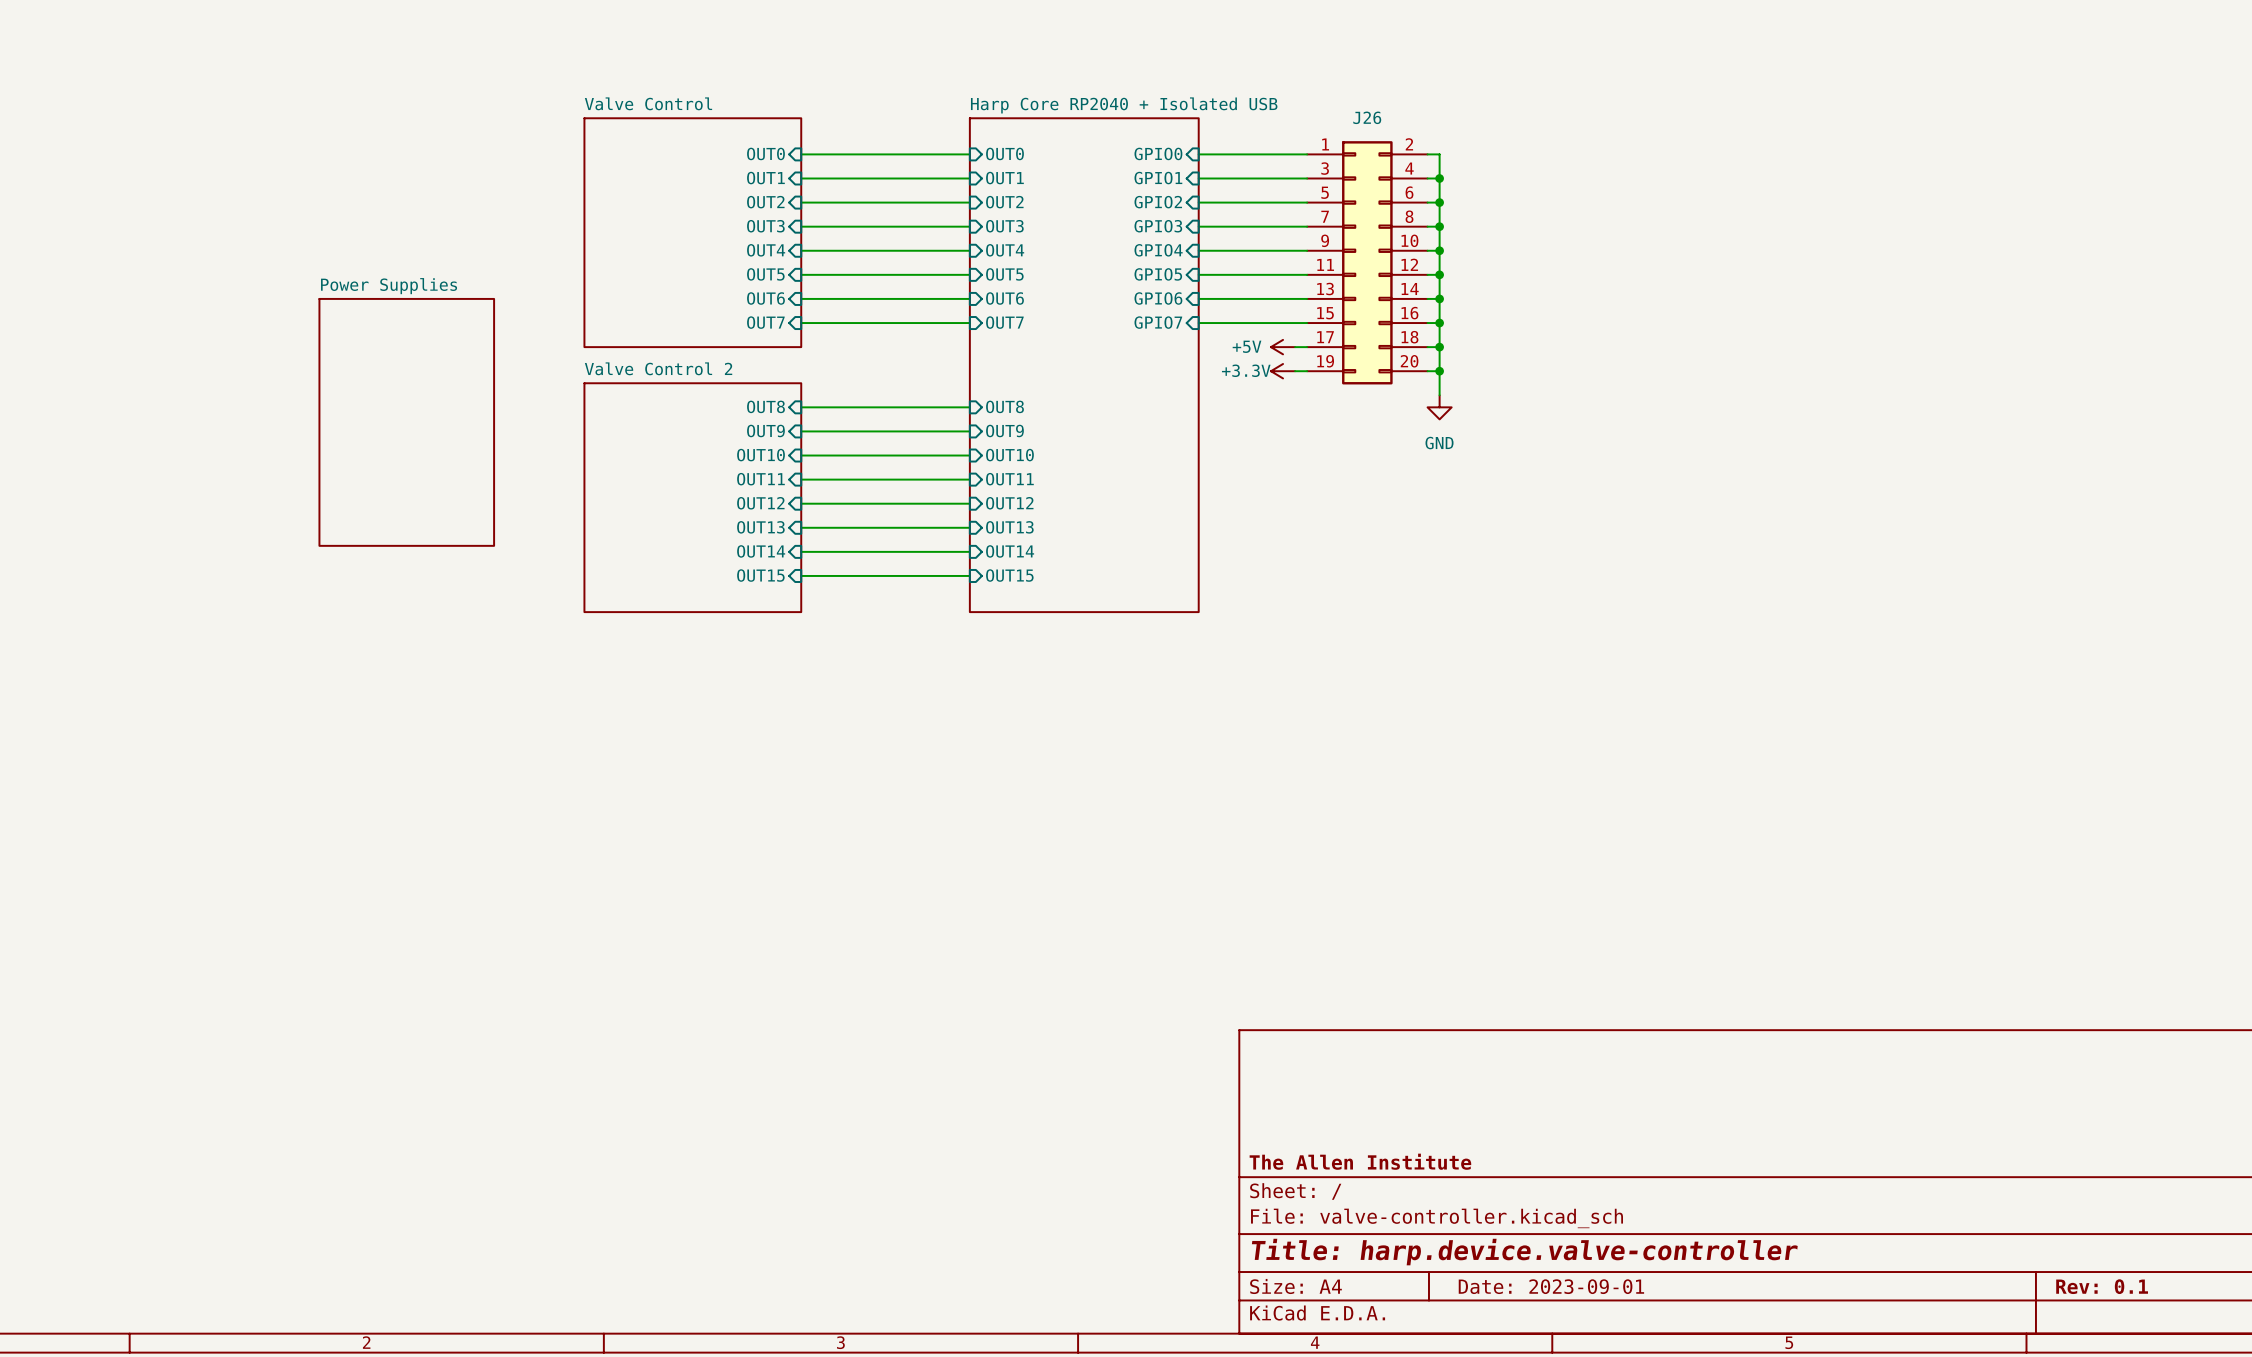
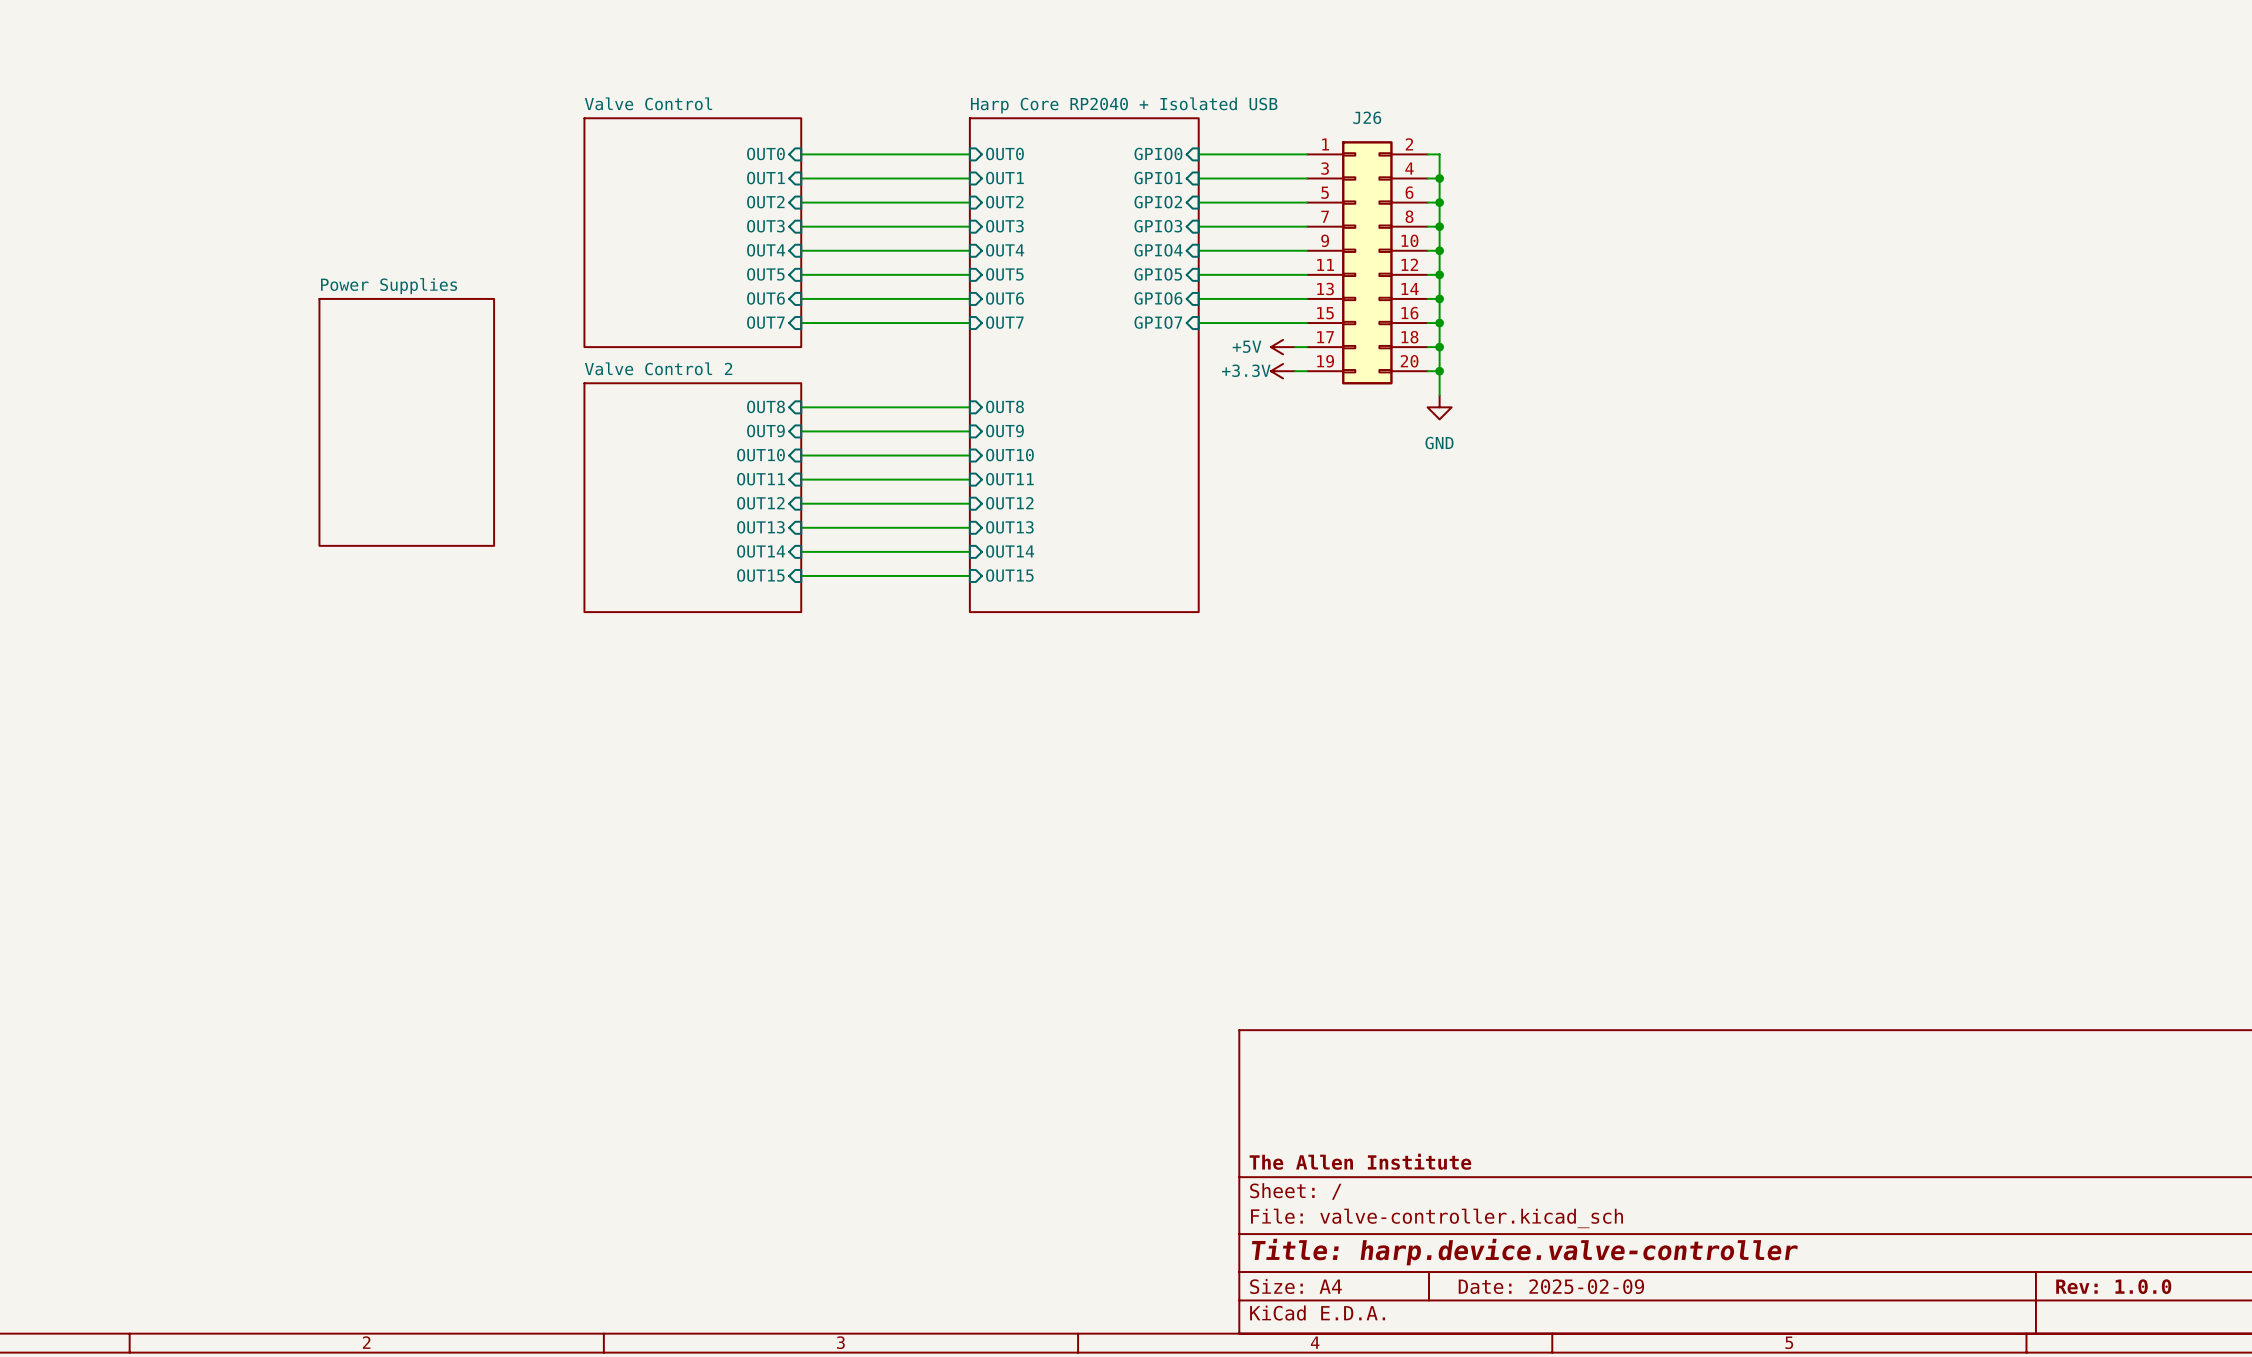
title block: Date: 2023-09-01 (1551, 1286) -> Date: 2025-02-09 (1551, 1286)
title block: Rev: 0.1 (2102, 1286) -> Rev: 1.0.0 (2113, 1286)

